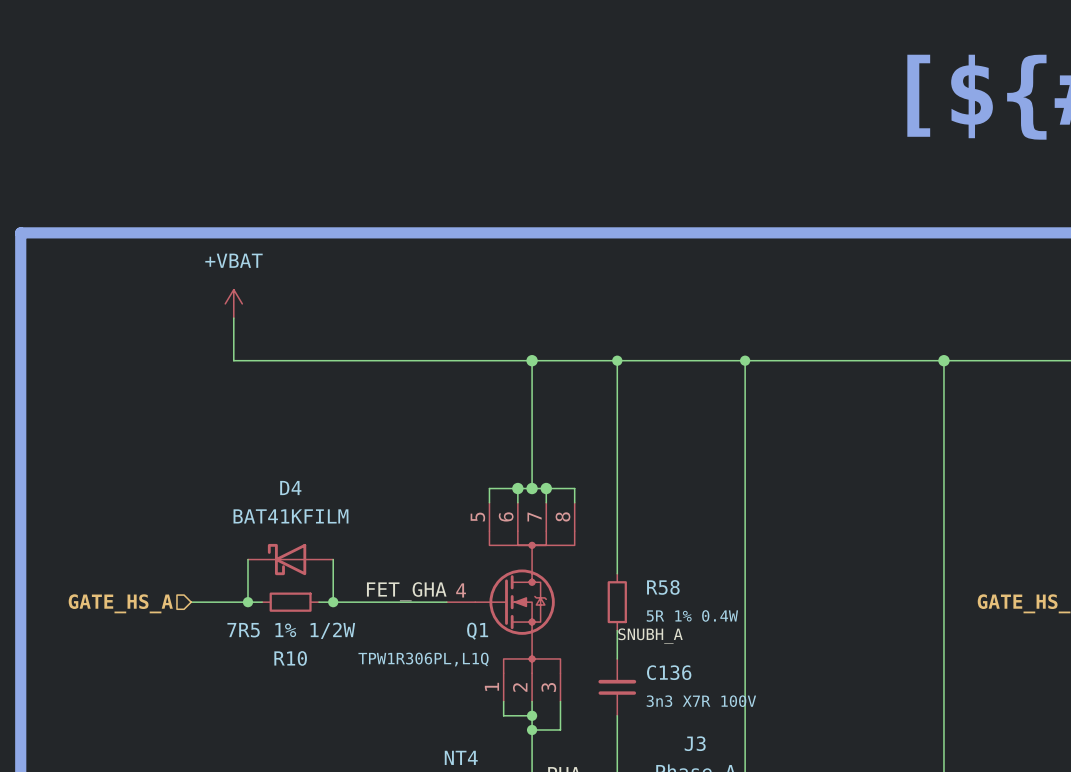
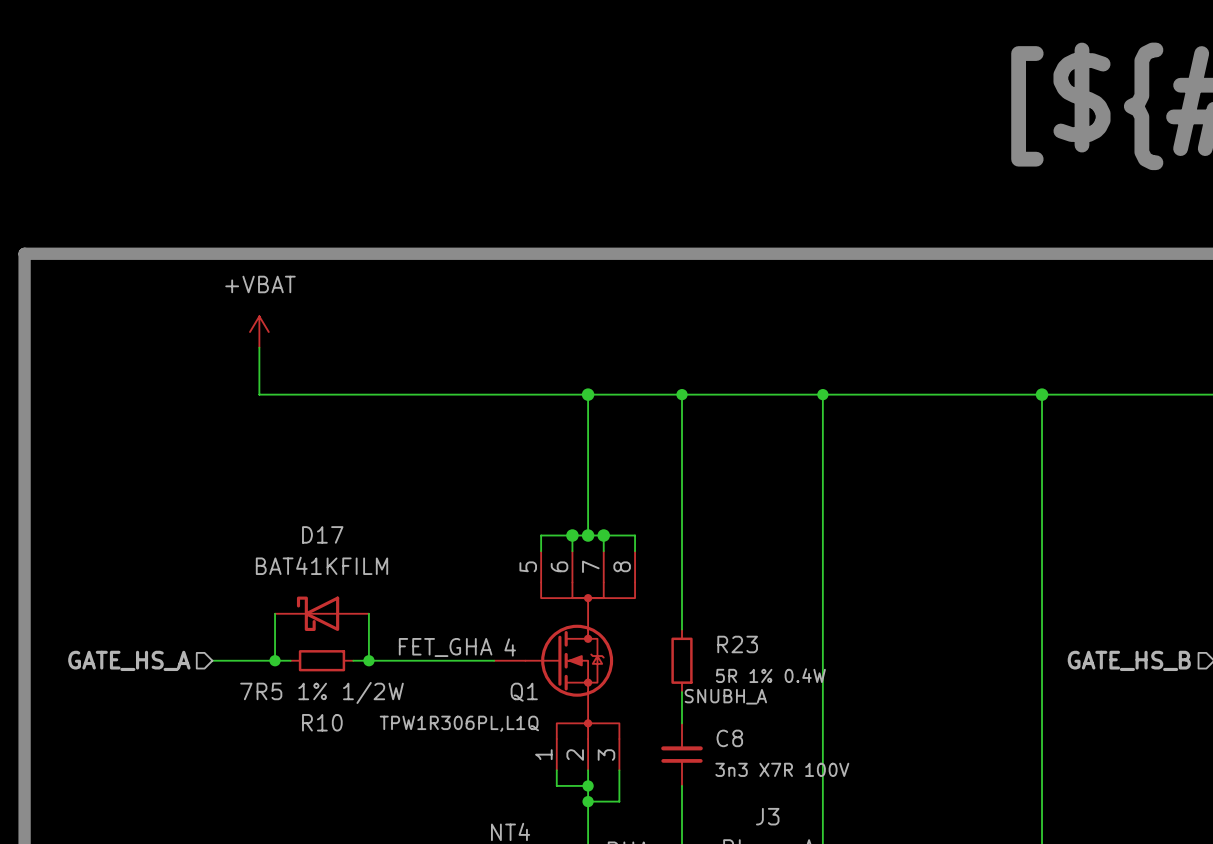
D4 name: D4 (290, 488) -> D17 (322, 534)
R58 name: R58 (663, 587) -> R23 (737, 644)
C136 name: C136 (669, 672) -> C8 (729, 738)

